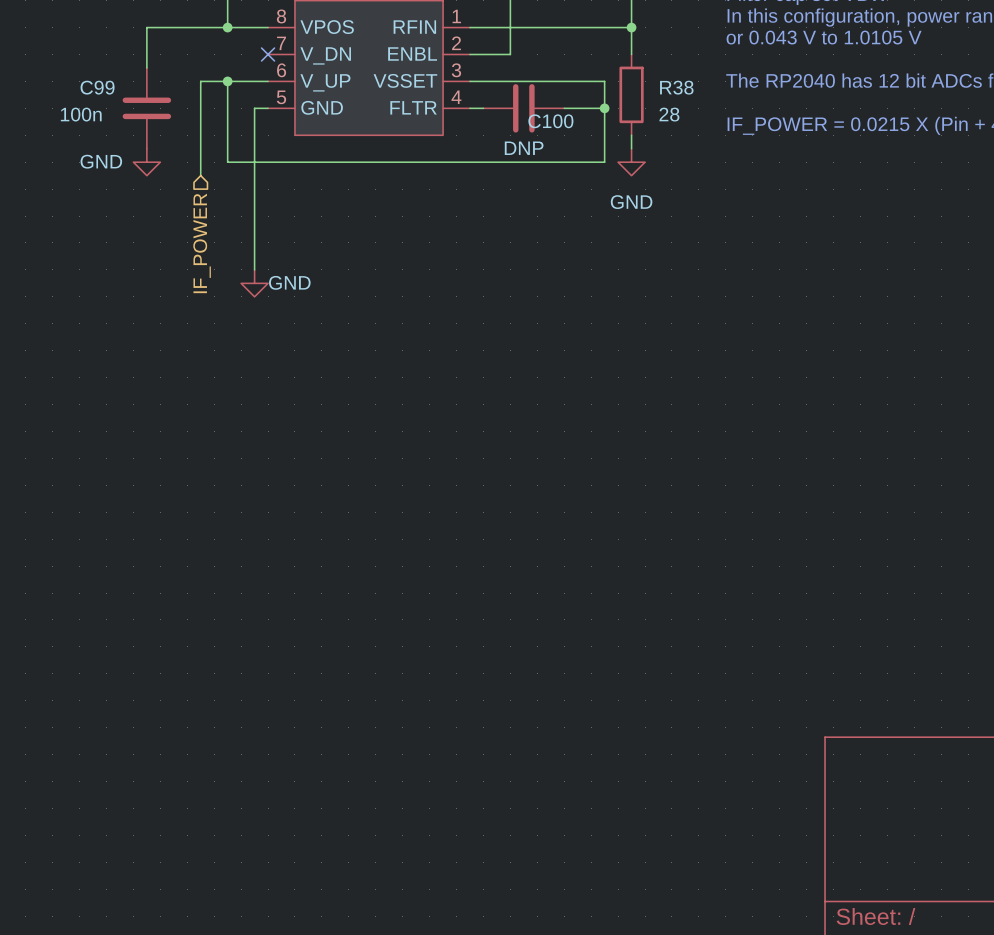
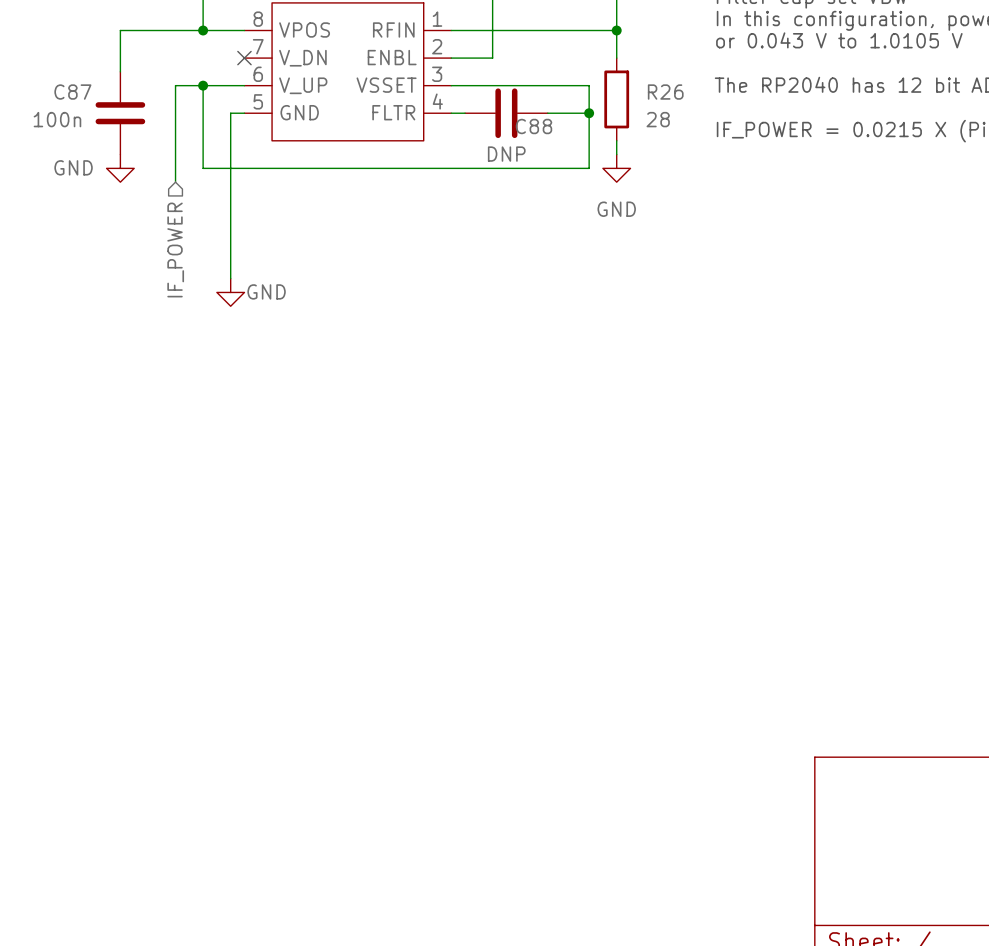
C99 name: C99 (97, 87) -> C87 (72, 92)
R38 name: R38 (676, 87) -> R26 (665, 92)
C100 name: C100 (550, 121) -> C88 (533, 126)

